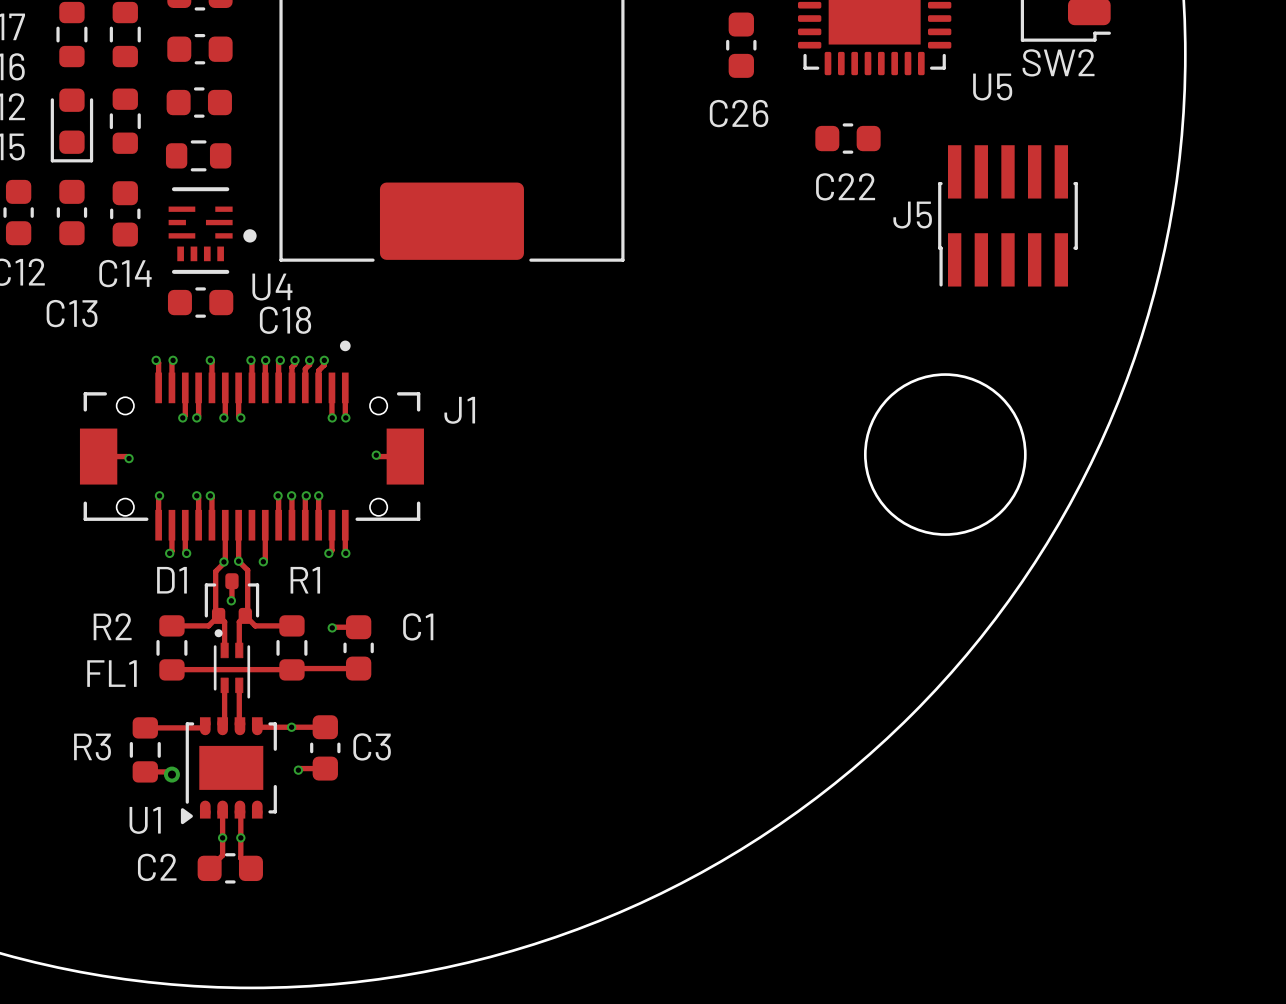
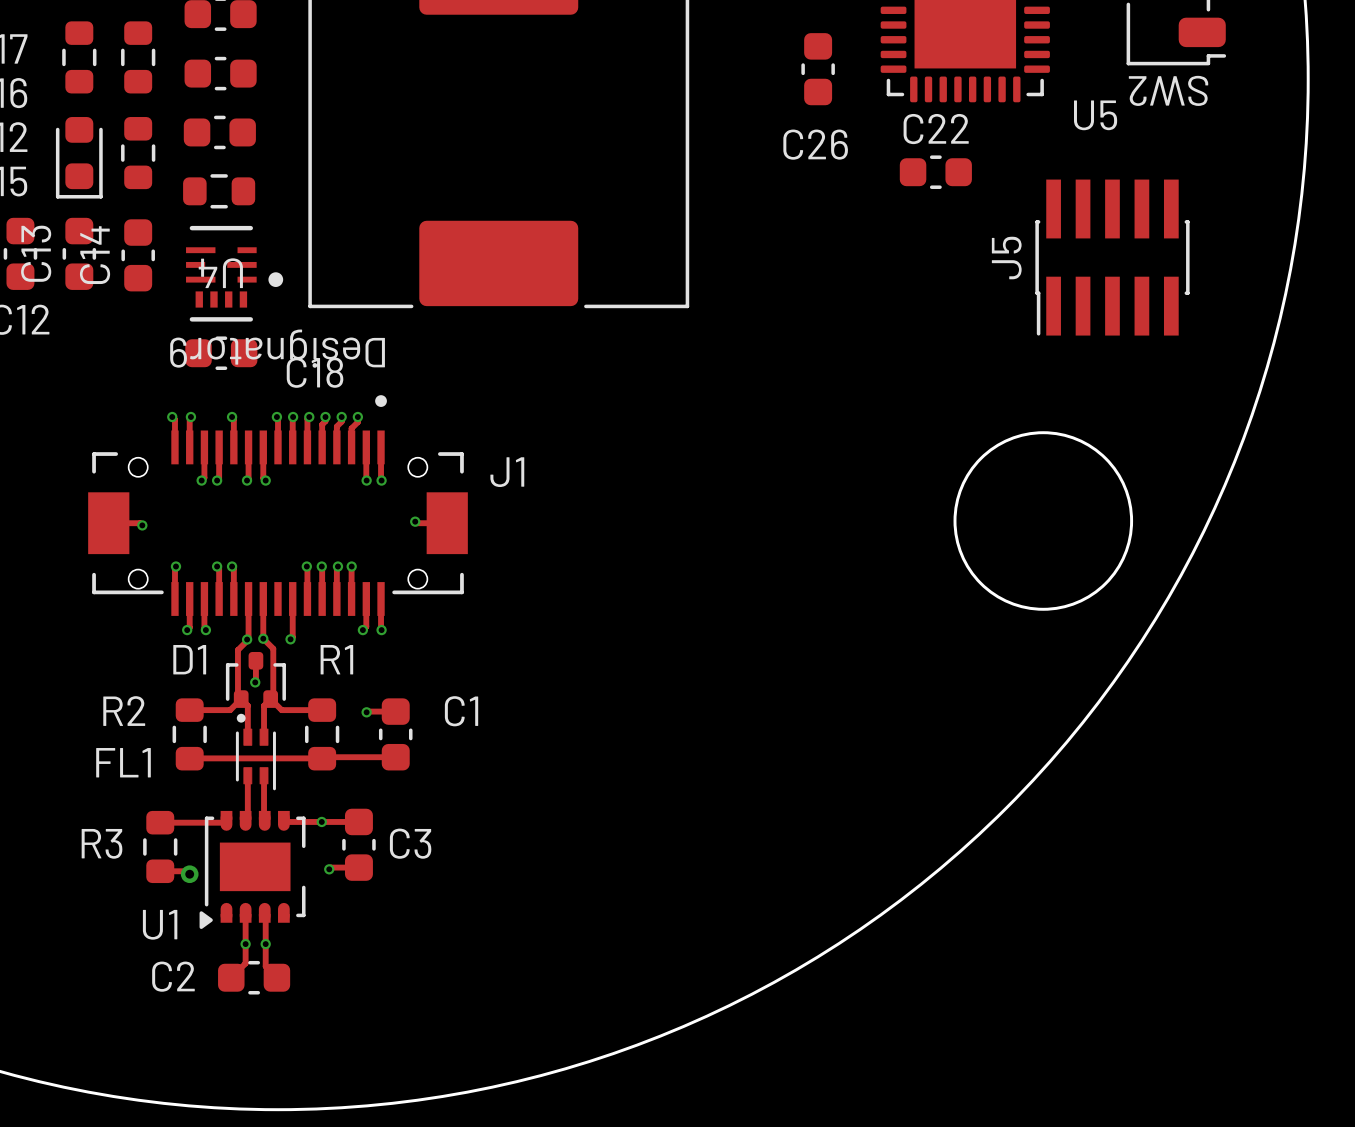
SW2 name rotation: 0° (1058, 62) -> 180° (1168, 90)
C22 name position: C22 (845, 186) -> C22 (936, 129)
J5 name rotation: 0° (912, 215) -> 90° counterclockwise (1006, 258)
C14 name rotation: 0° (125, 273) -> 90° counterclockwise (95, 255)
U4 name rotation: 0° (272, 287) -> 180° (220, 273)
U4 name position: U4 (272, 287) -> U4 (220, 273)
U4 text: none -> Designator9 (277, 348)
C13 name rotation: 0° (72, 313) -> 90° counterclockwise (36, 253)
C13 name position: C13 (72, 313) -> C13 (36, 253)

